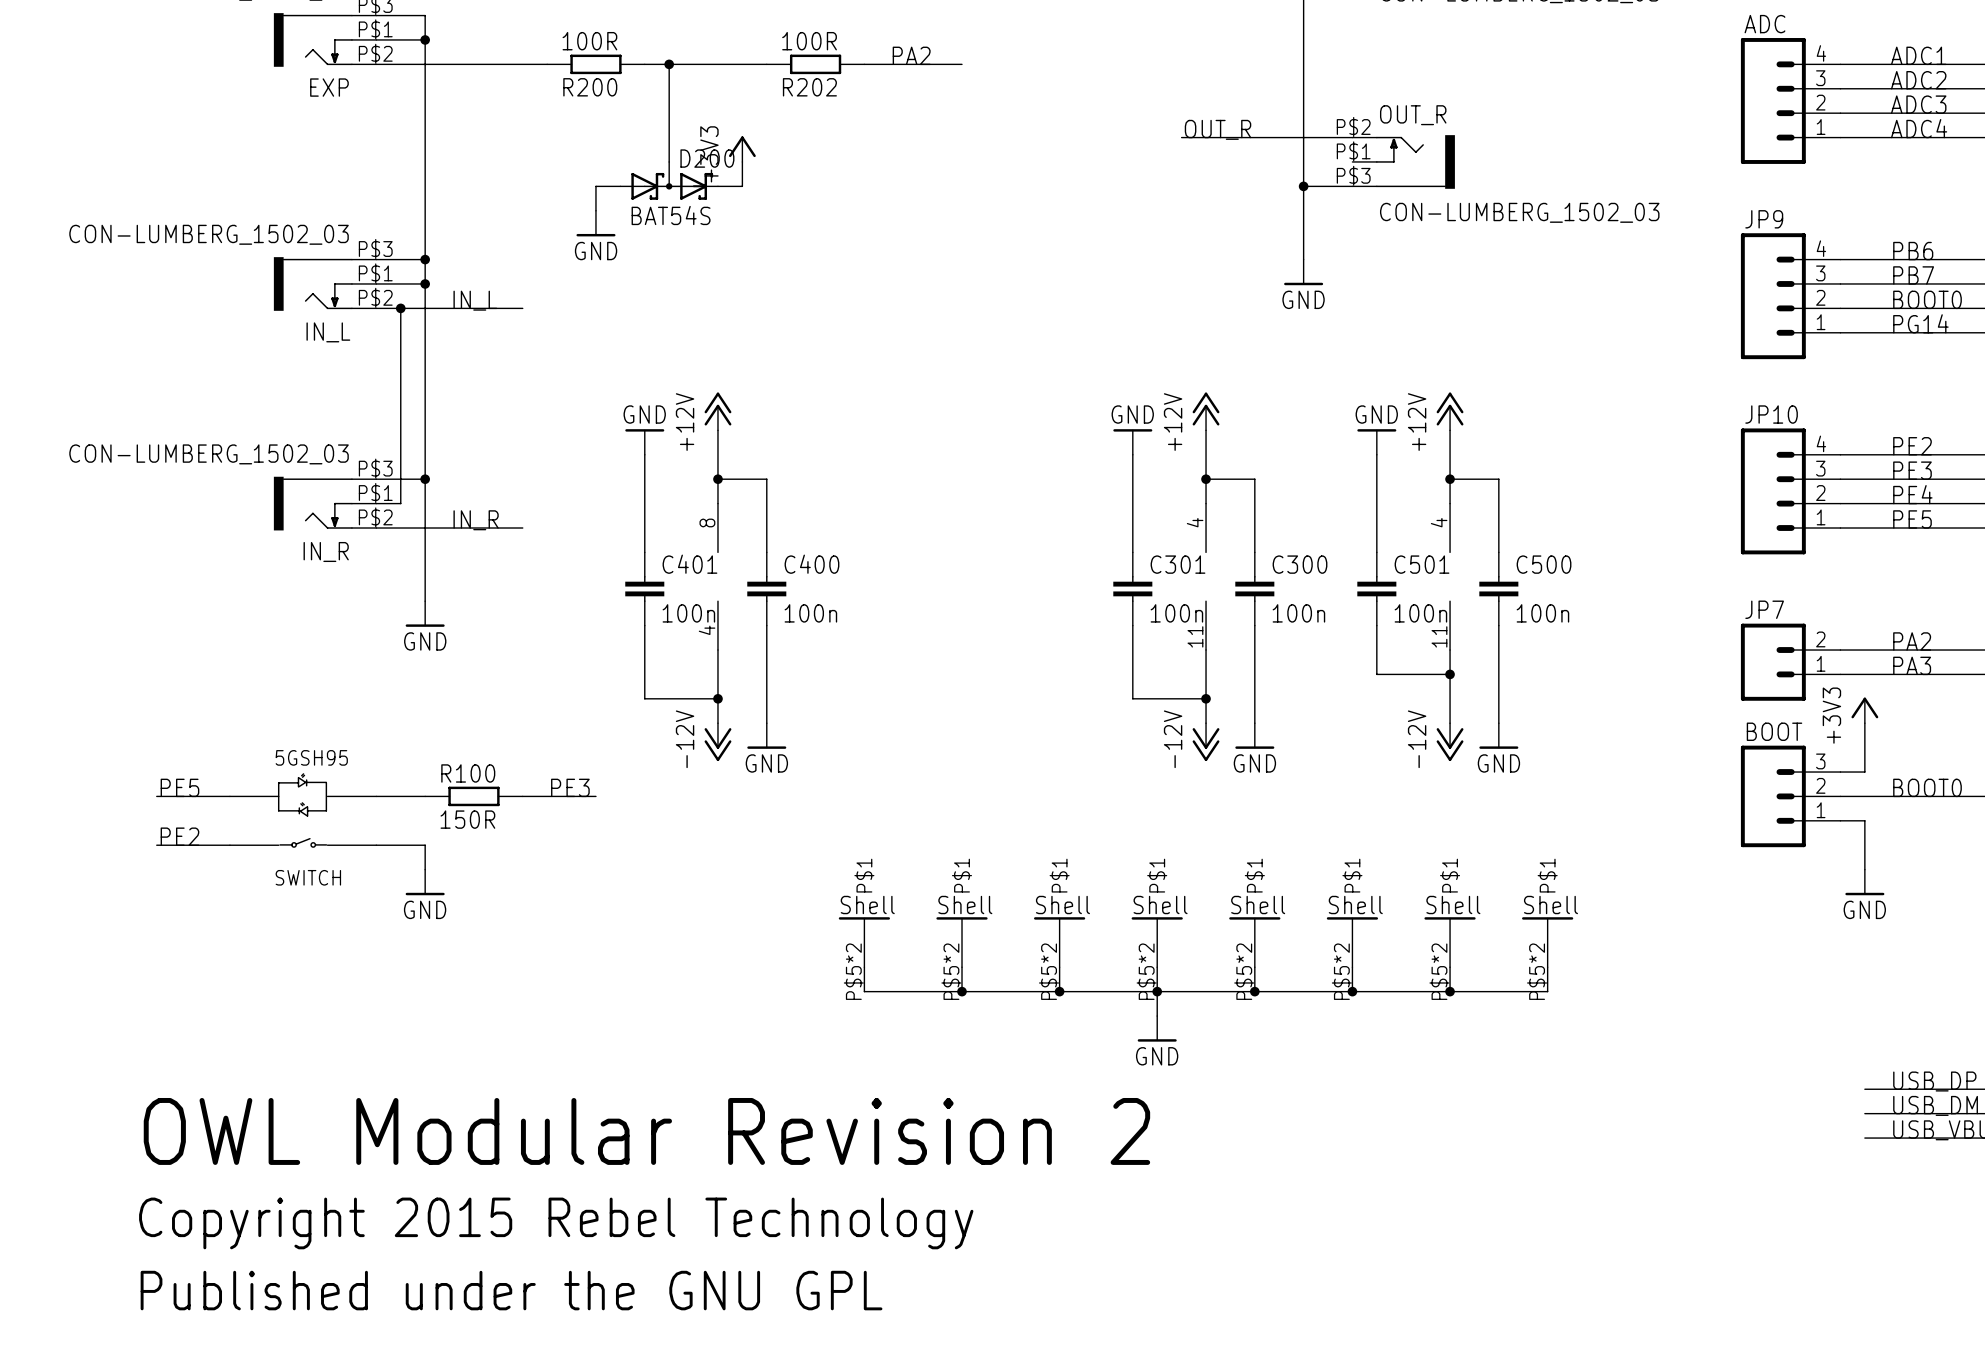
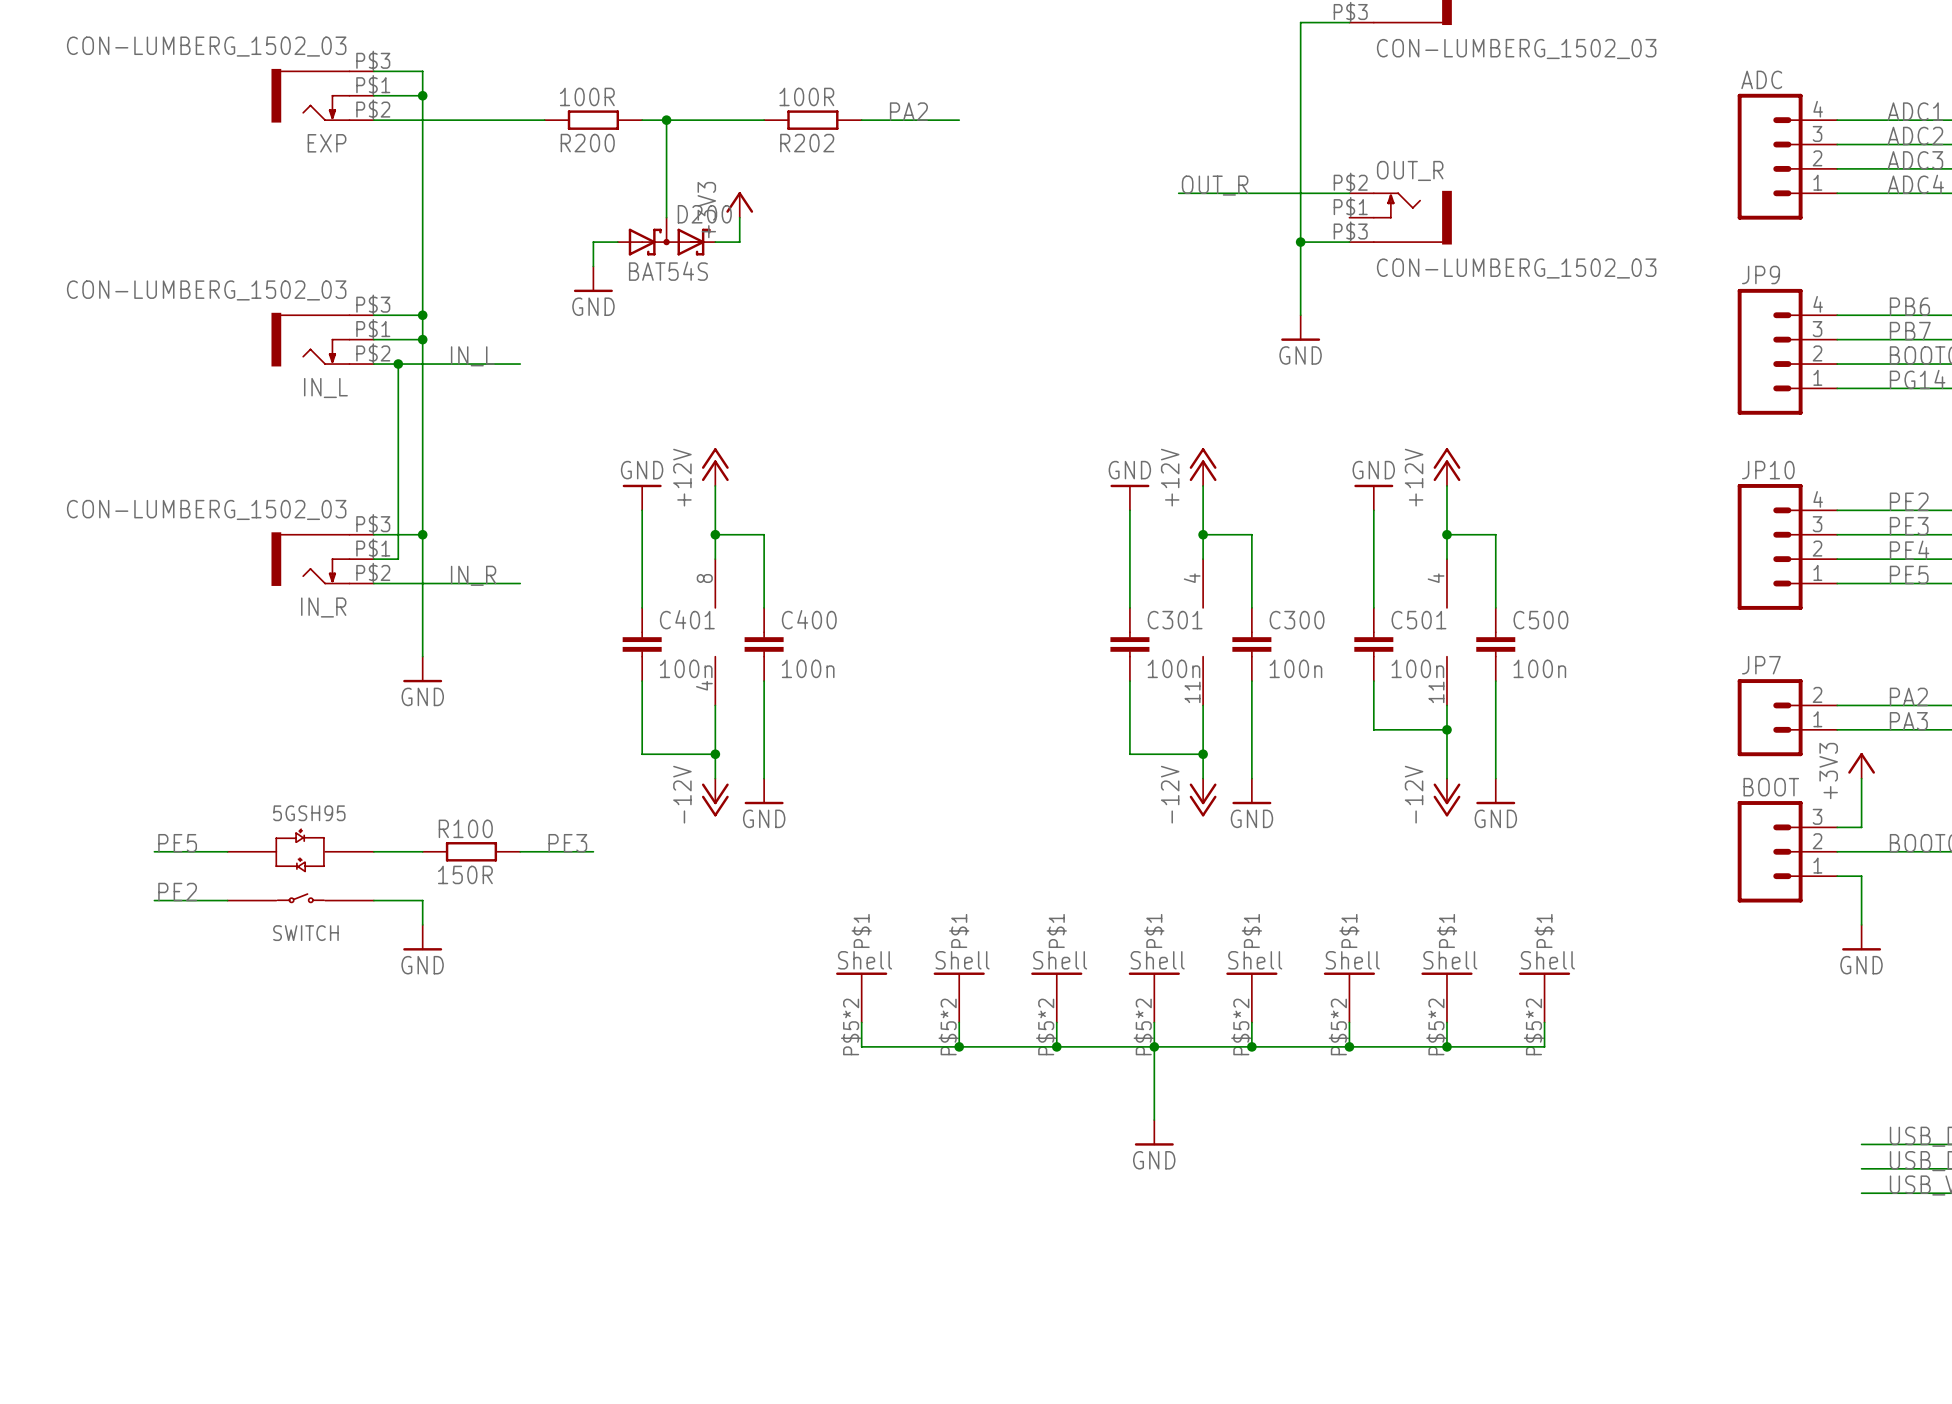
power symbol position: GND (1157, 1028) -> GND (1154, 1132)
text: OWL Modular Revision 2 (646, 1131) -> none
text: Copyright 2015 Rebel Technology (556, 1223) -> none
text: Published under the GNU GPL (511, 1290) -> none

